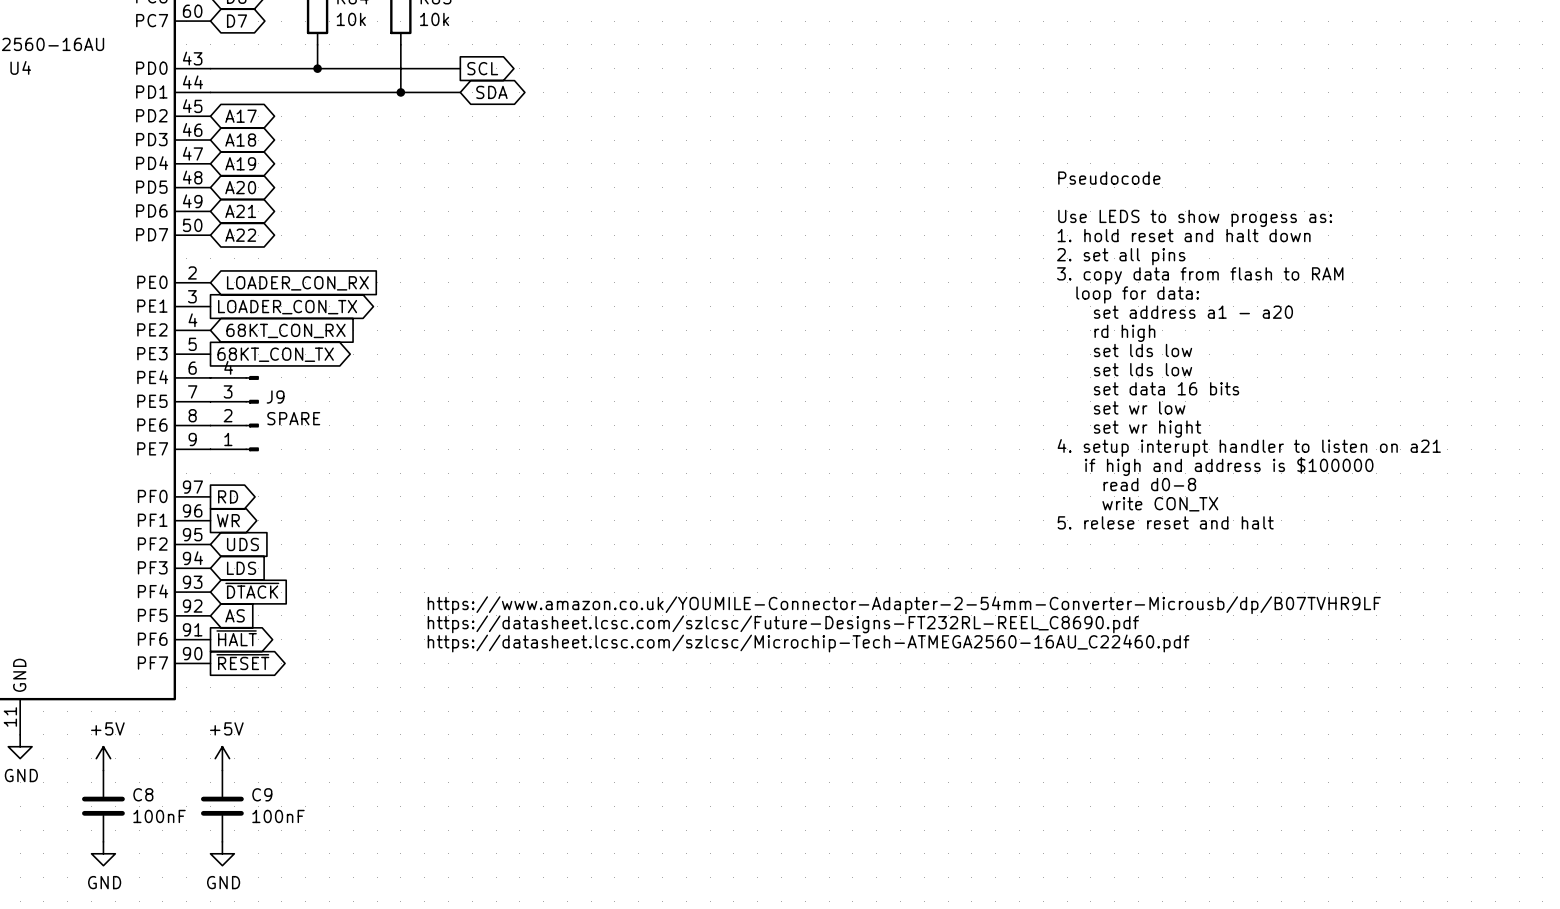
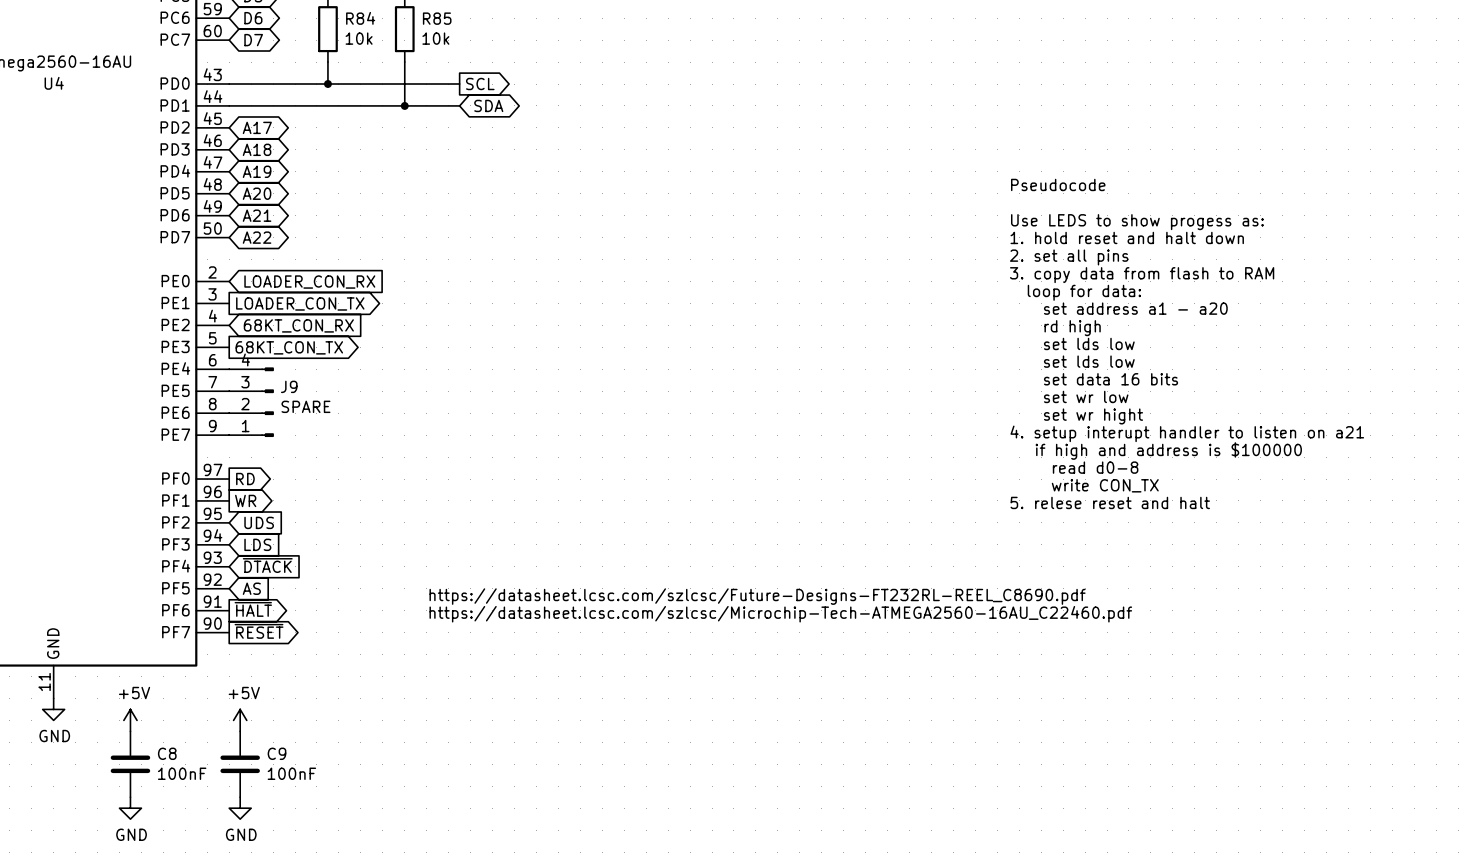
text: https://www.amazon.co.uk/YOUMILE-Connector-Adapter-2-54mm-Converter-Microusb/dp/B07TVHR9LF (904, 605) -> none

